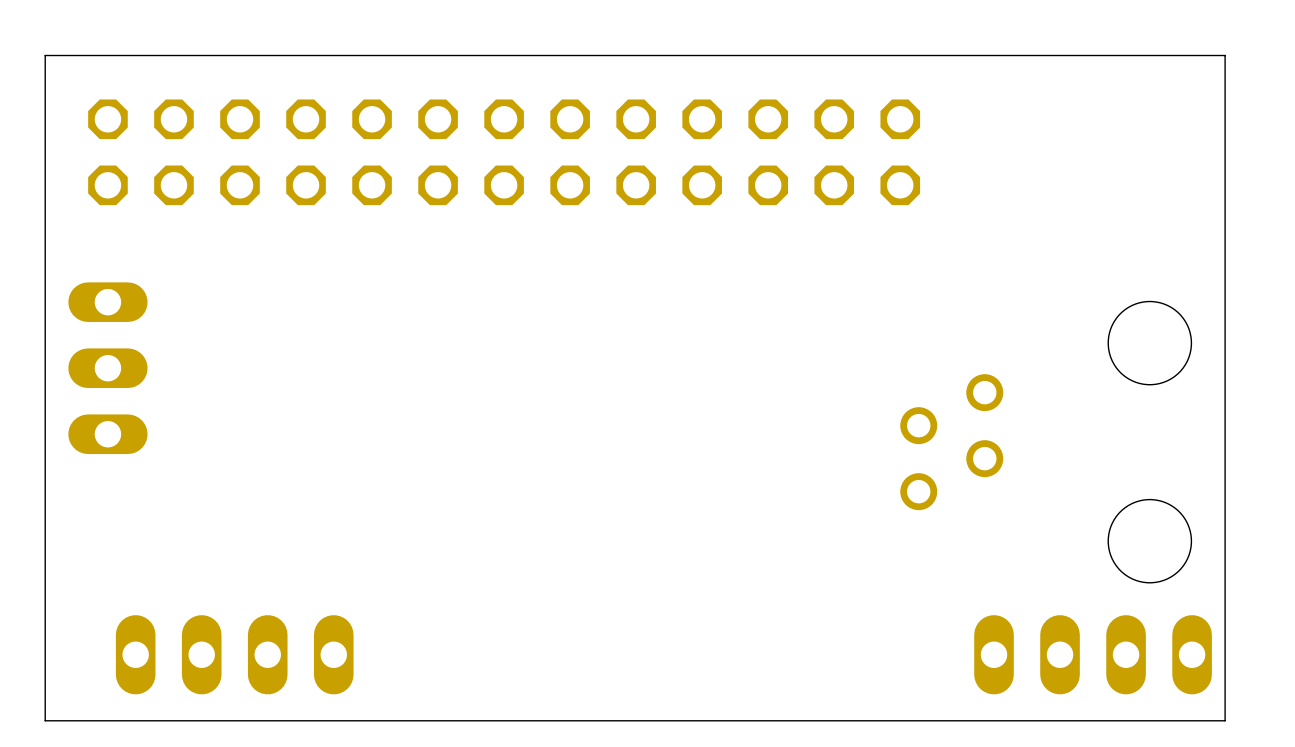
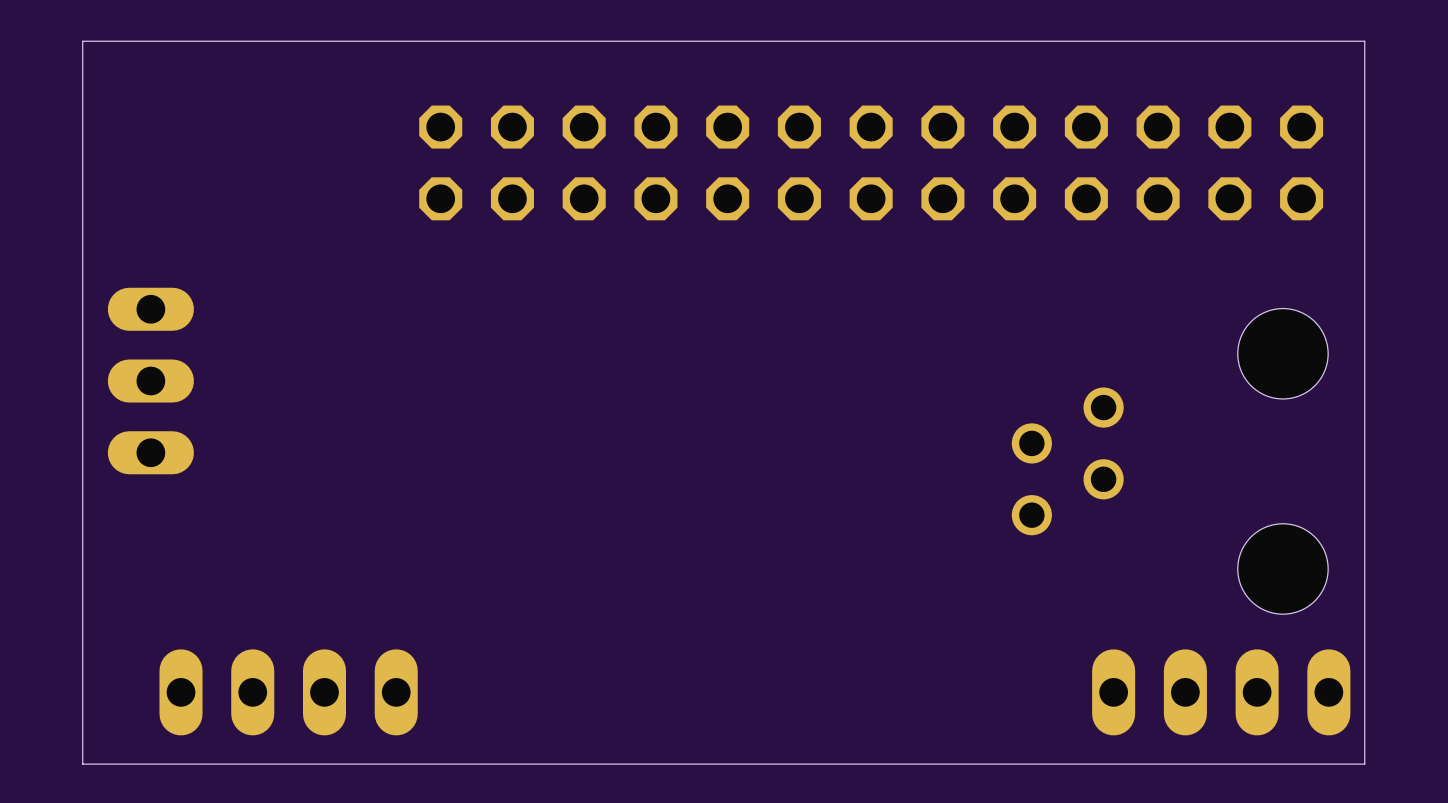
part position: (504, 152) -> (871, 162)

